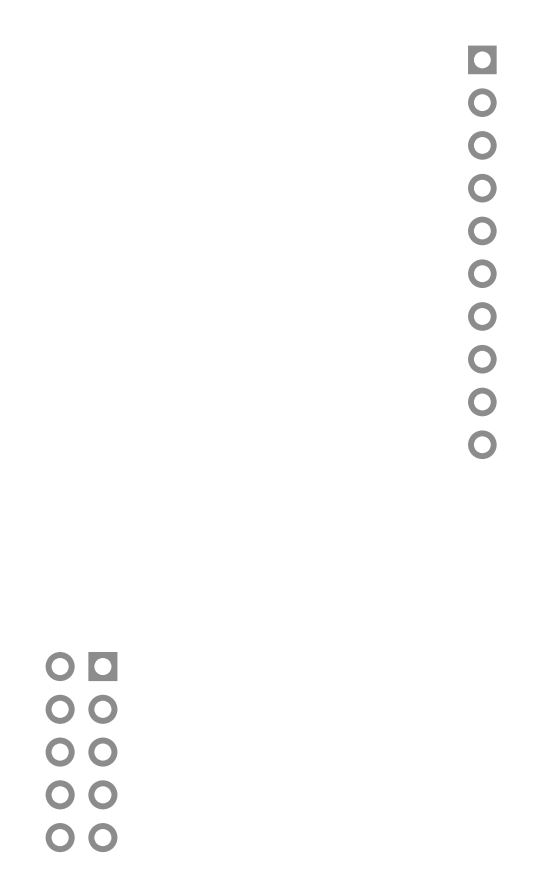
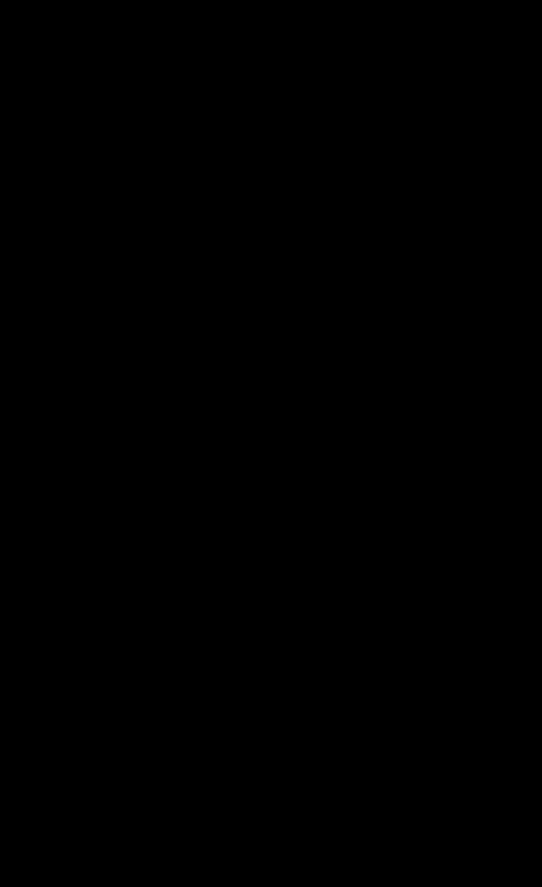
part: (482, 252) -> none
part: (81, 752) -> none

